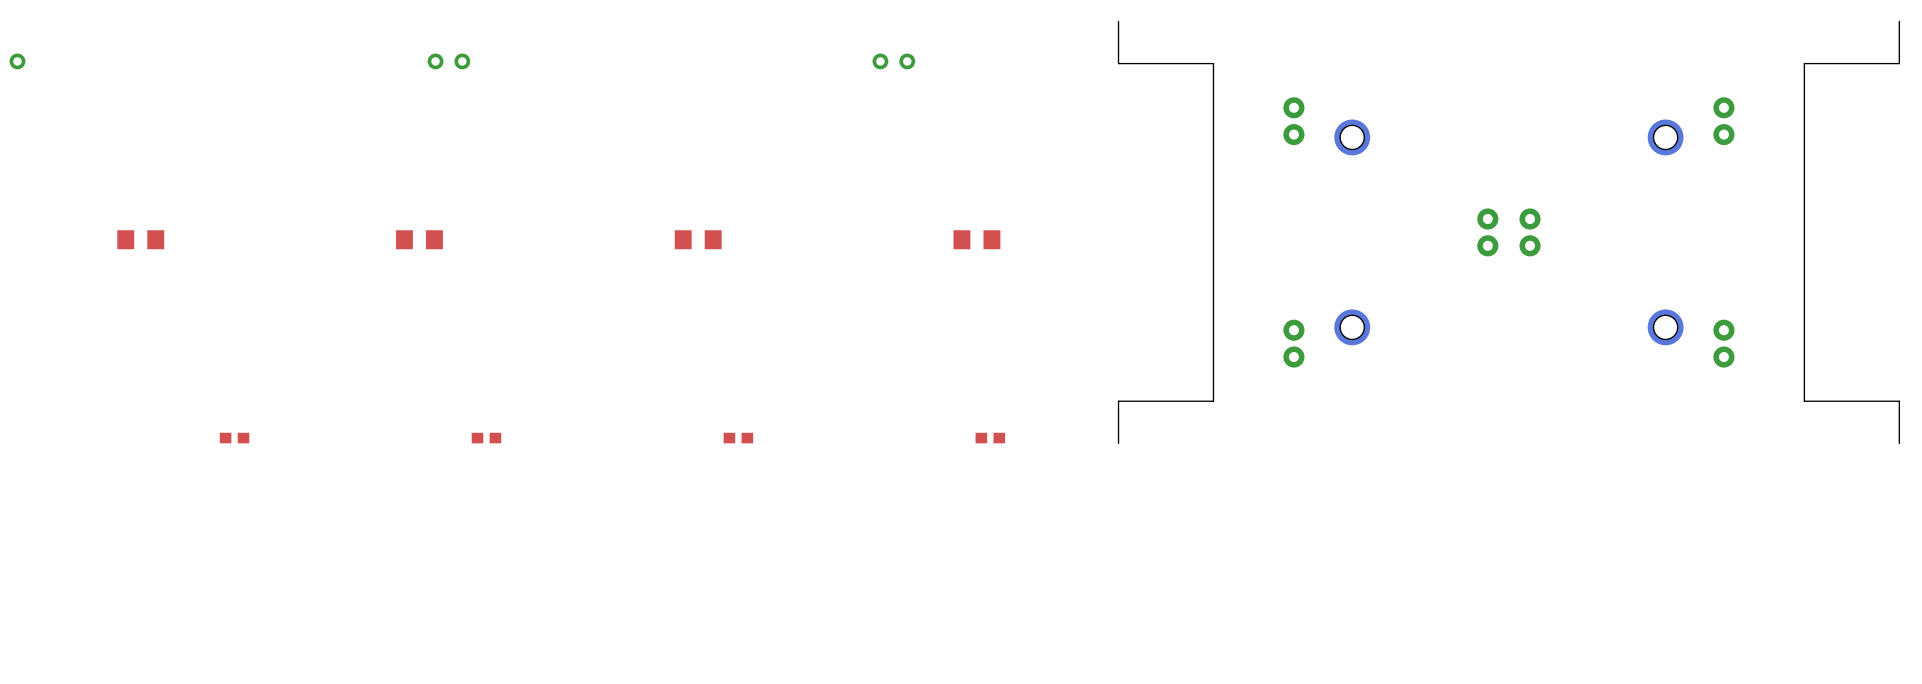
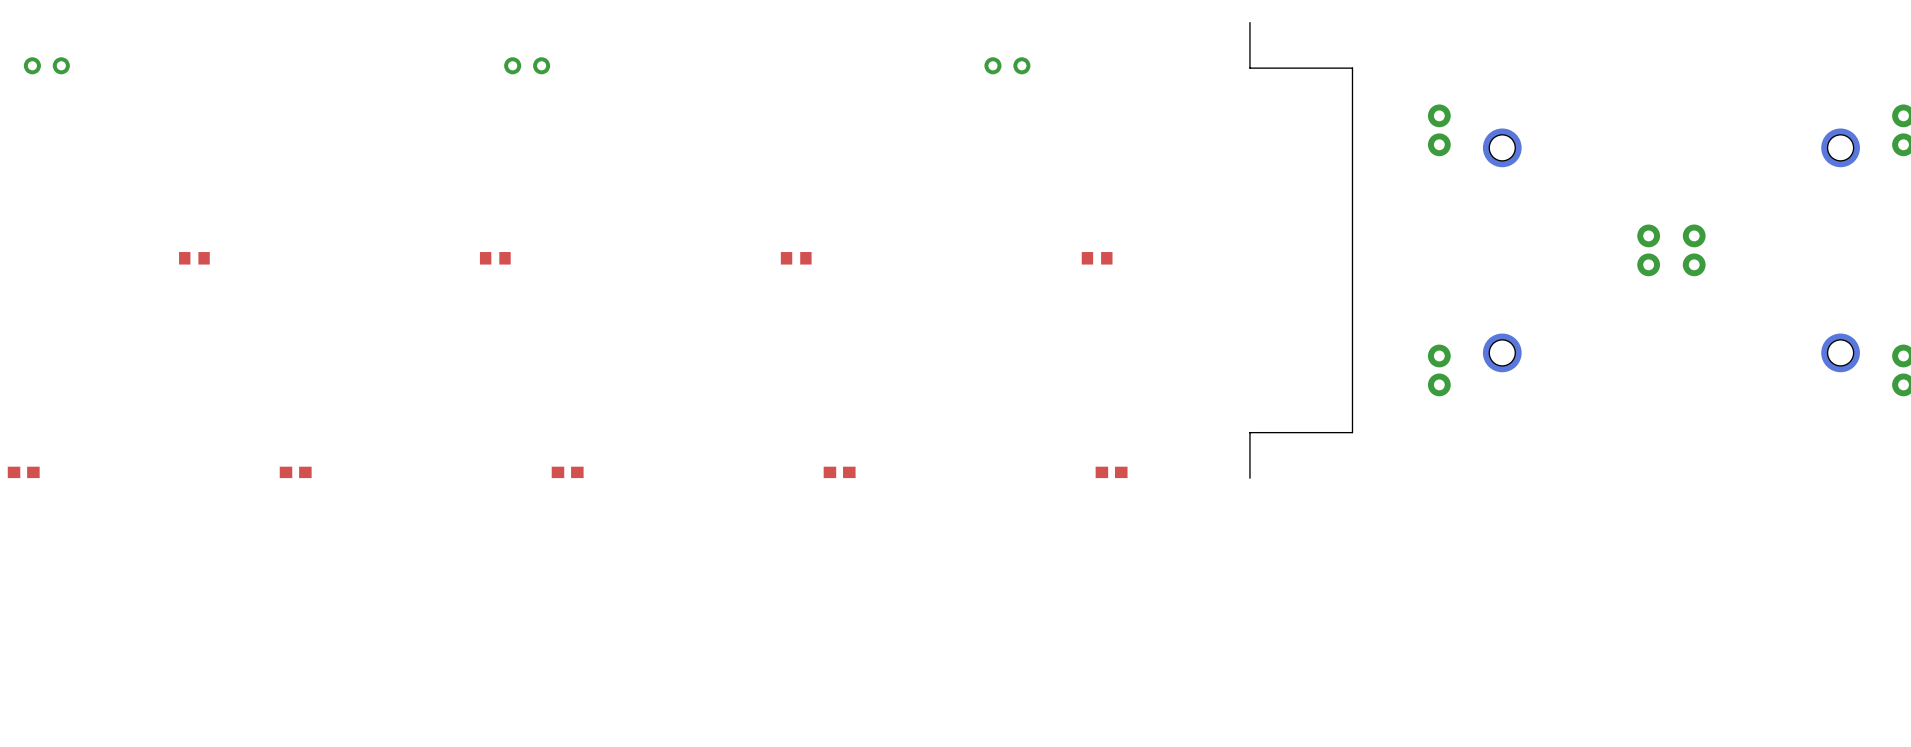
part footprint: [117, 230, 165, 250] -> [179, 252, 210, 265]
part footprint: [396, 230, 443, 250] -> [479, 252, 511, 265]
part footprint: [674, 230, 722, 250] -> [780, 252, 812, 265]
part footprint: [953, 230, 1001, 250] -> [1081, 252, 1113, 265]

